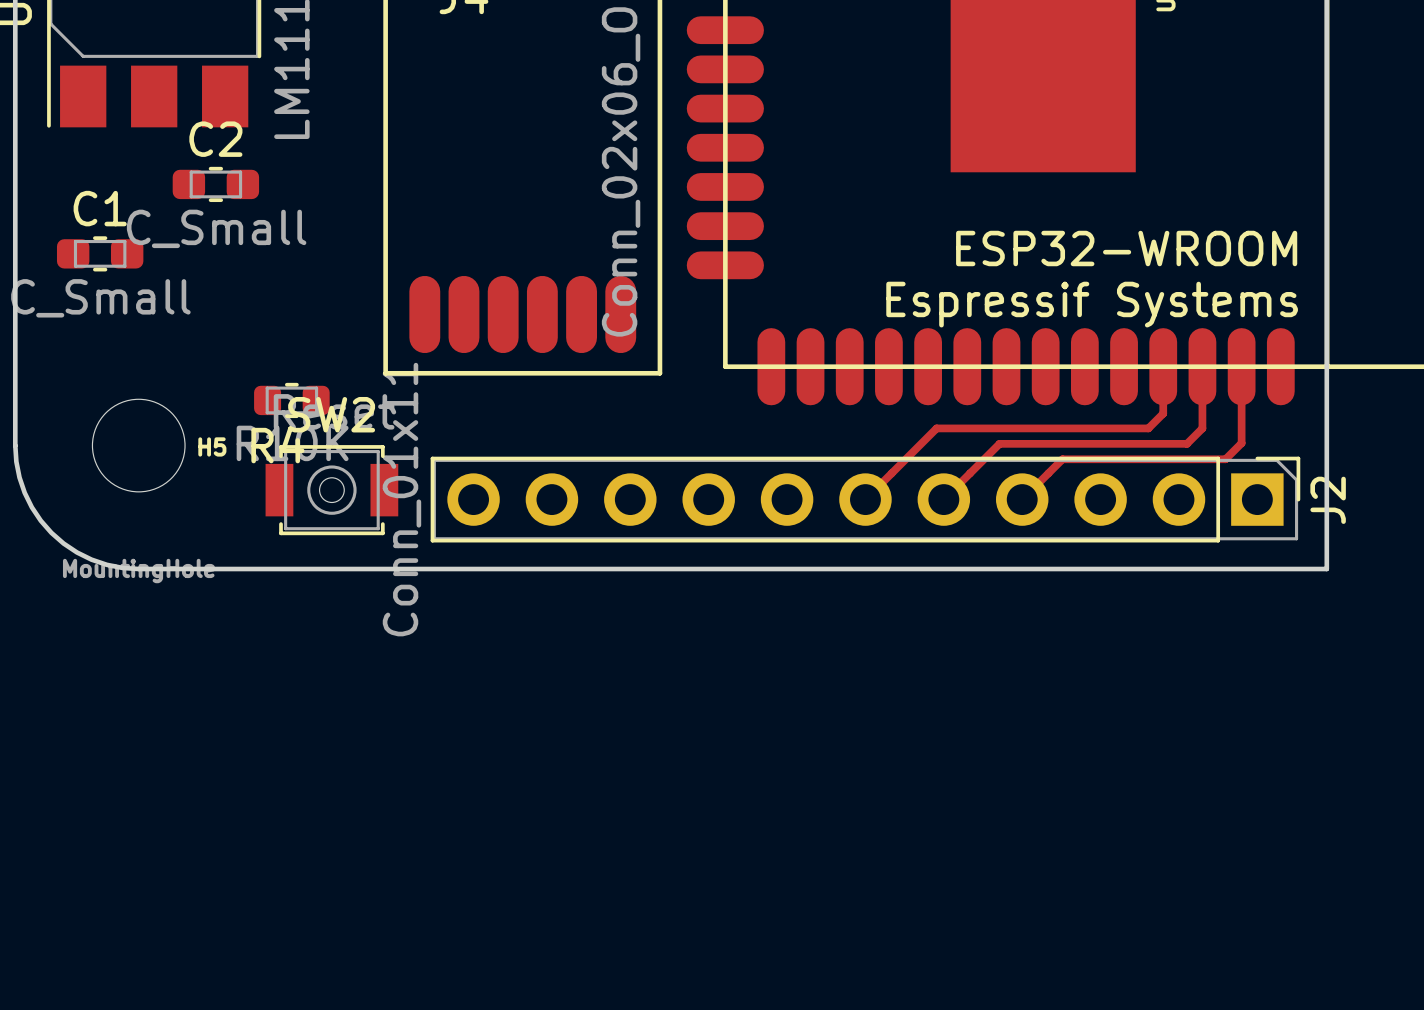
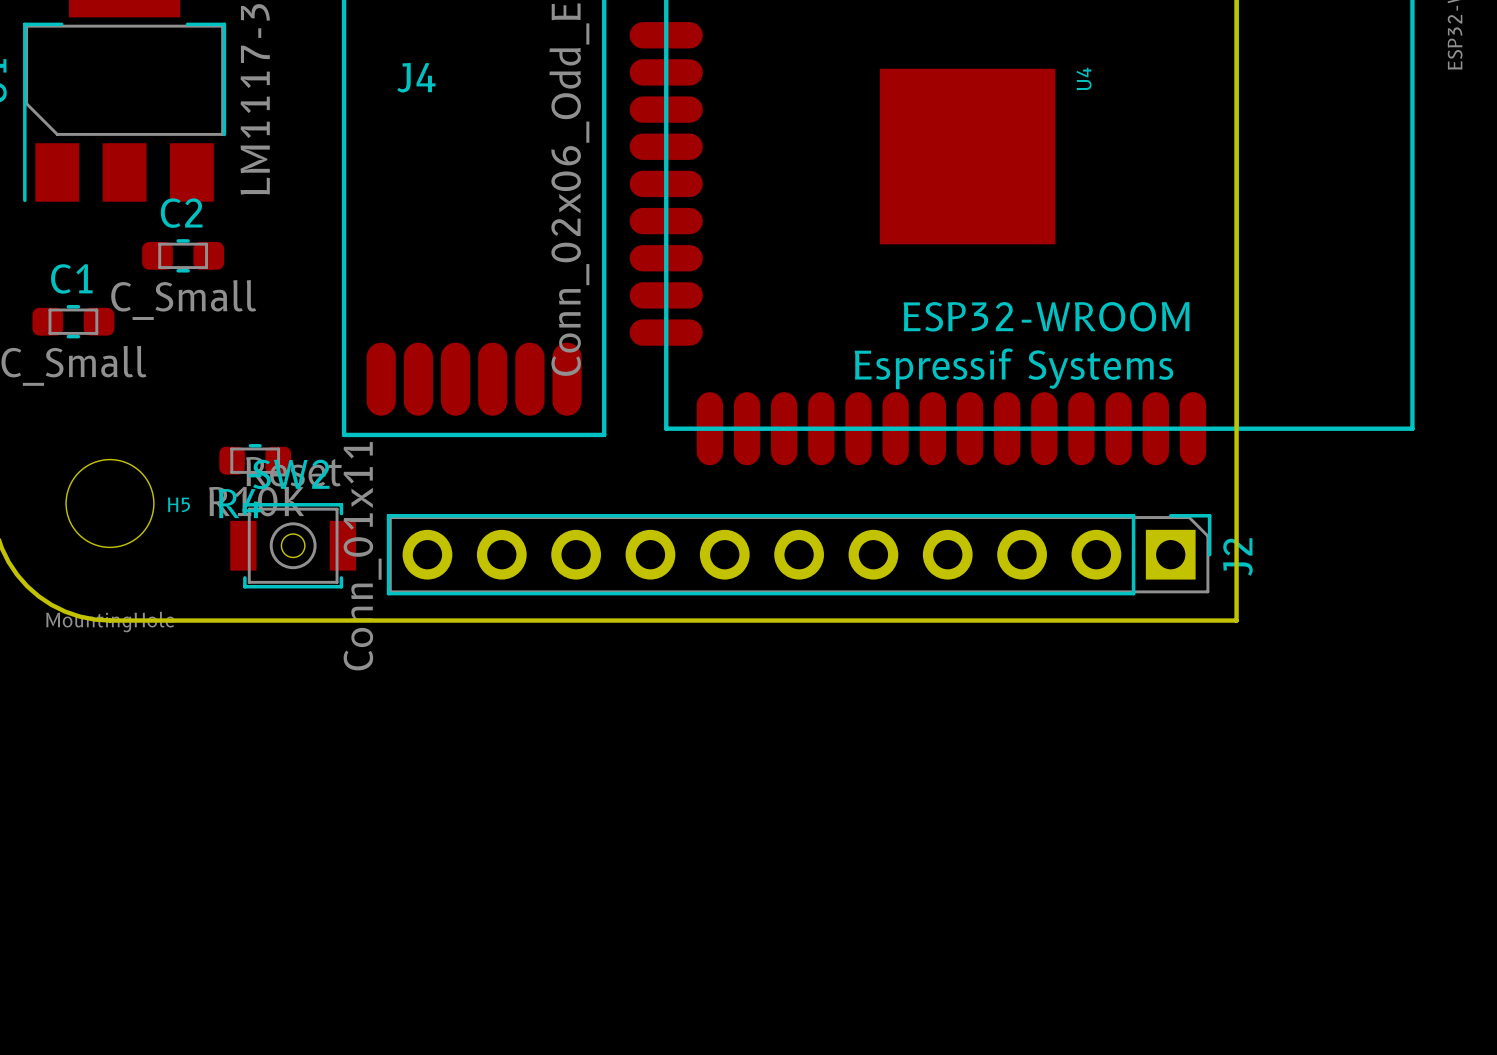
track: (1163, 366) (1163, 413) (1148, 428) (936, 428) (865, 499) -> none
track: (1202, 366) (1202, 428) (1187, 443) (999, 443) (943, 499) -> none
track: (1241, 366) (1241, 443) (1225, 459) (1062, 459) (1022, 499) -> none

